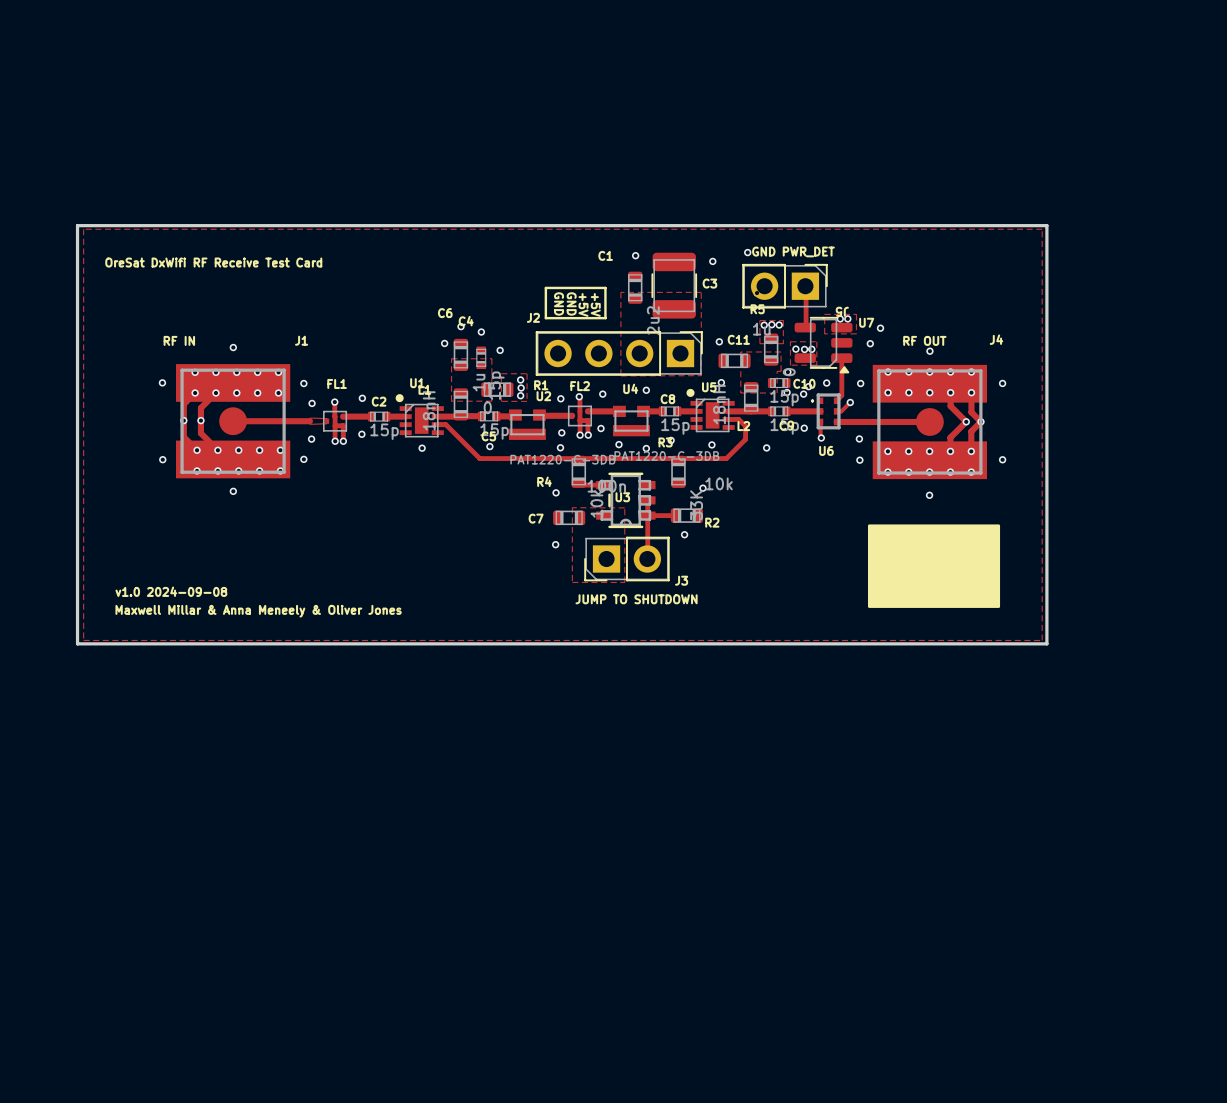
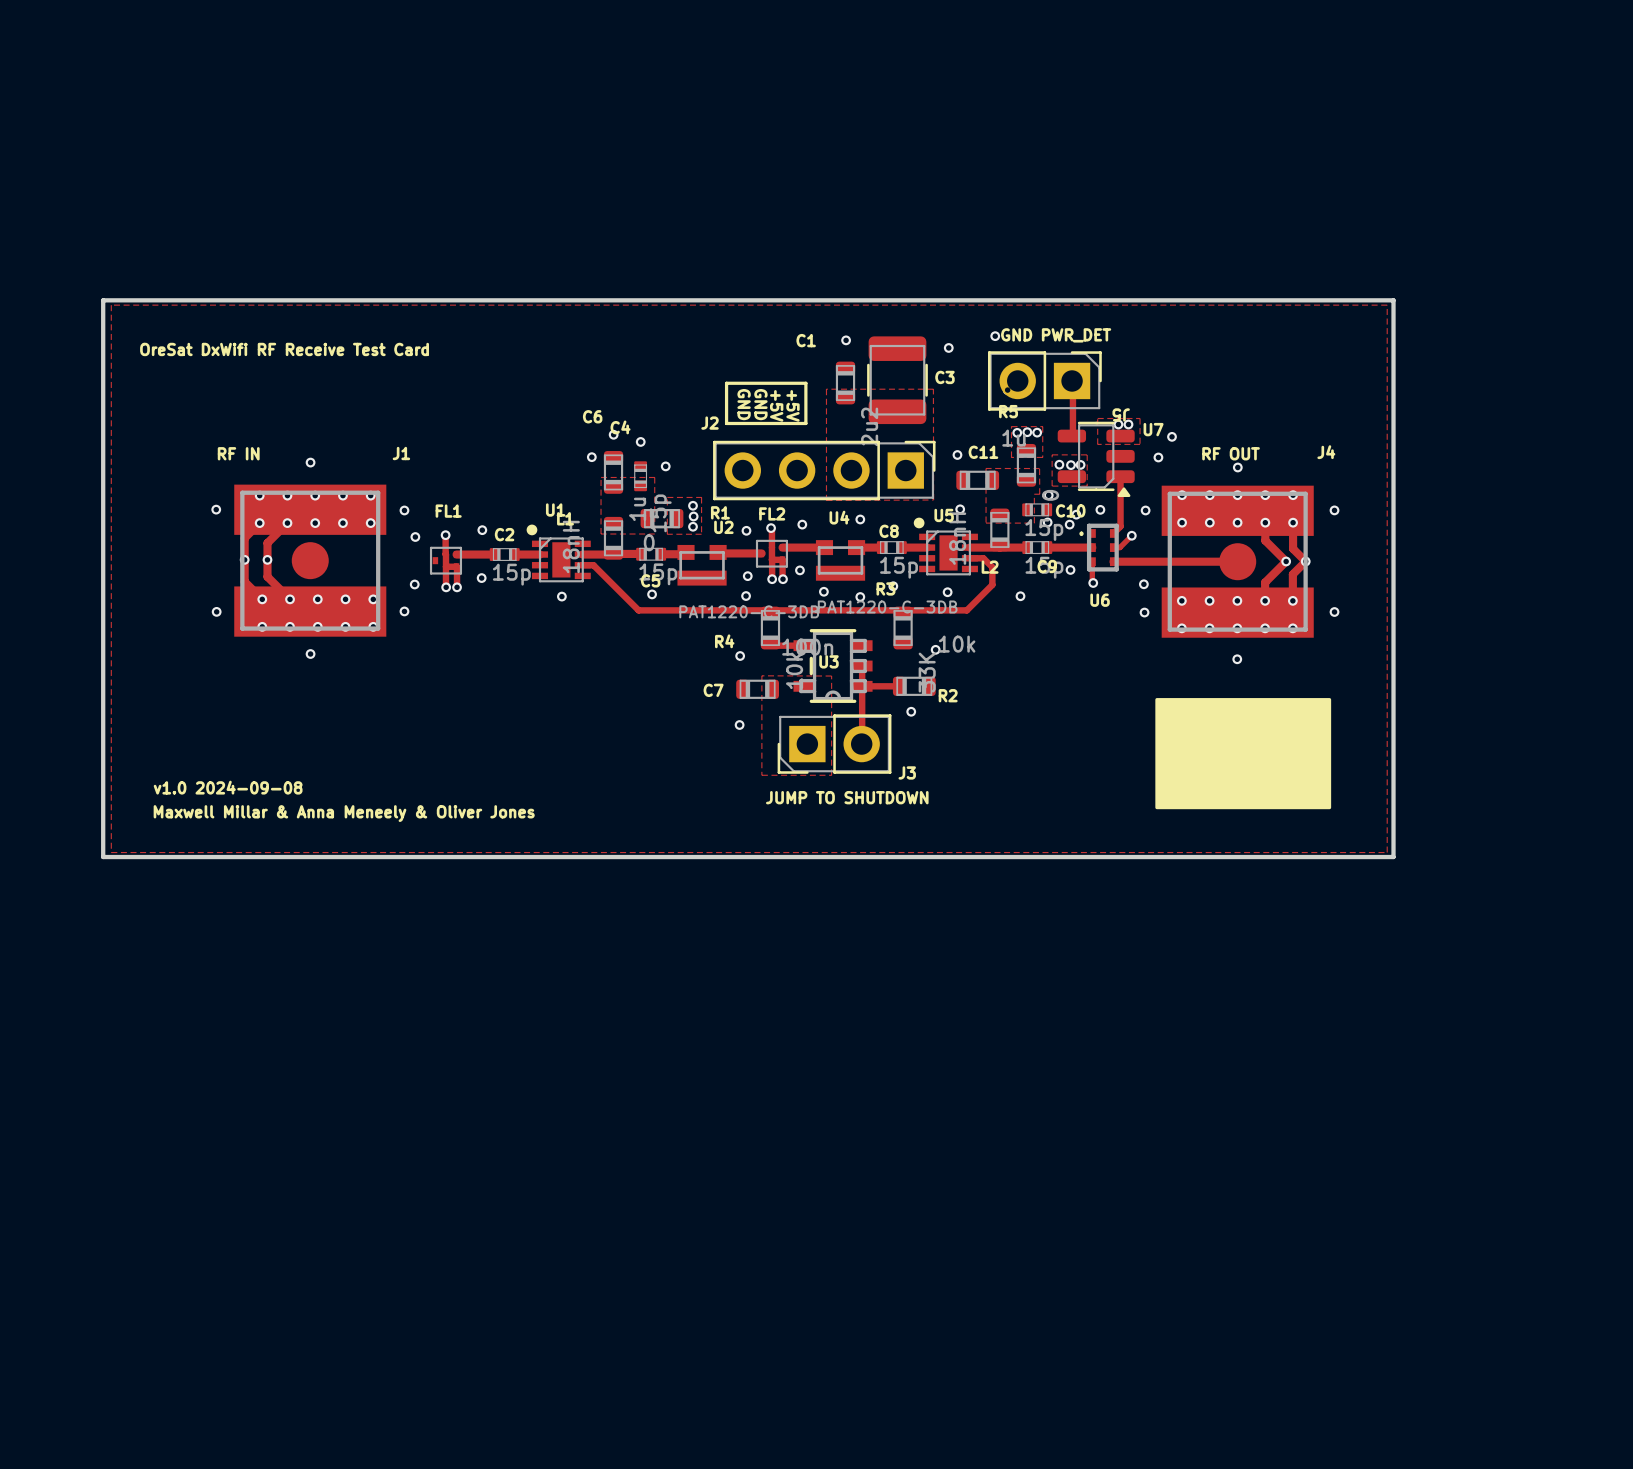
zone outline: (309, 418) (327, 418) (327, 423) (309, 424) (309, 418) -> none
track: (233, 421) (309, 421) -> none

